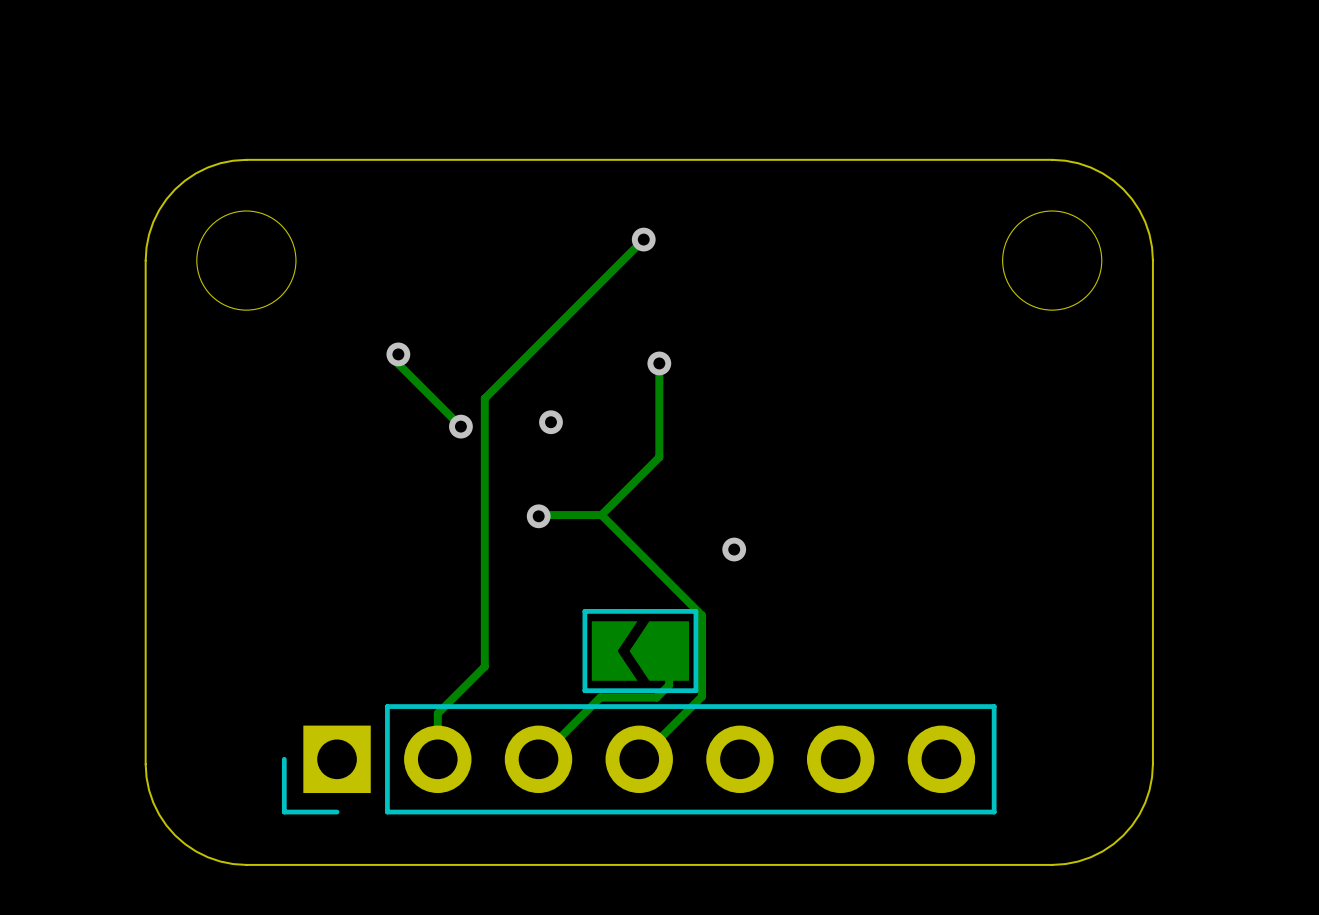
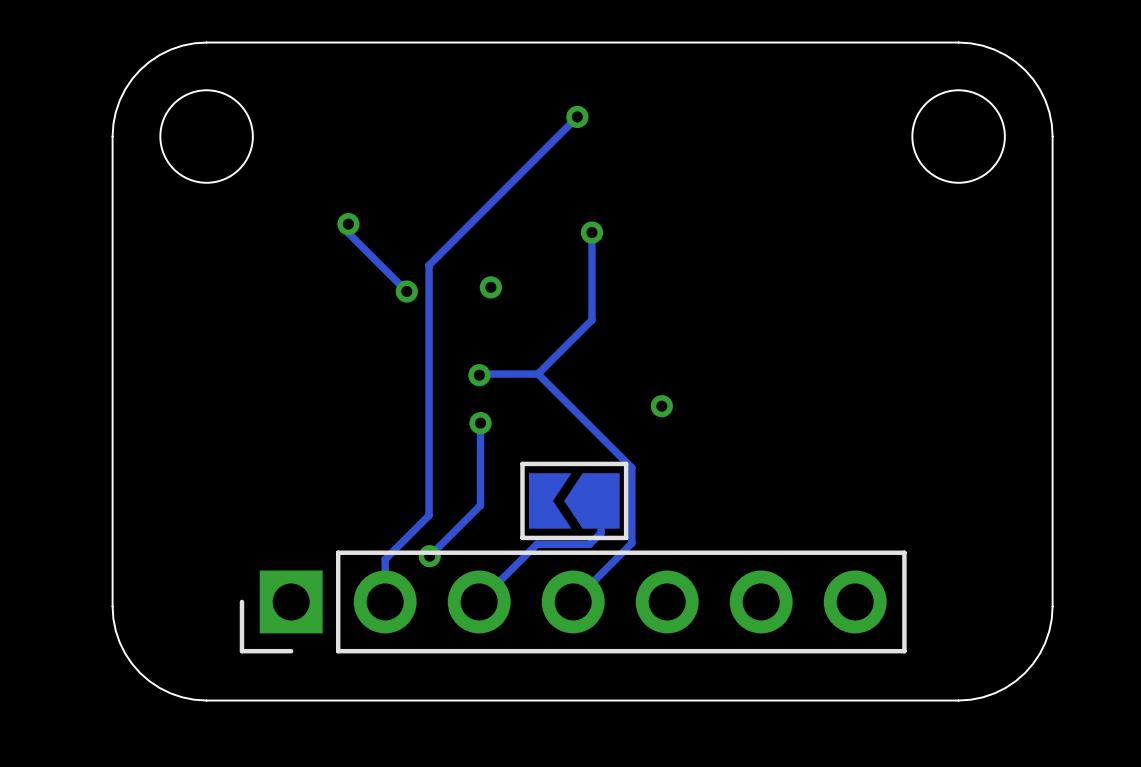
track: none -> (480, 423) (480, 505) (429, 556)
via: none -> (480, 423)
via: none -> (429, 556)

